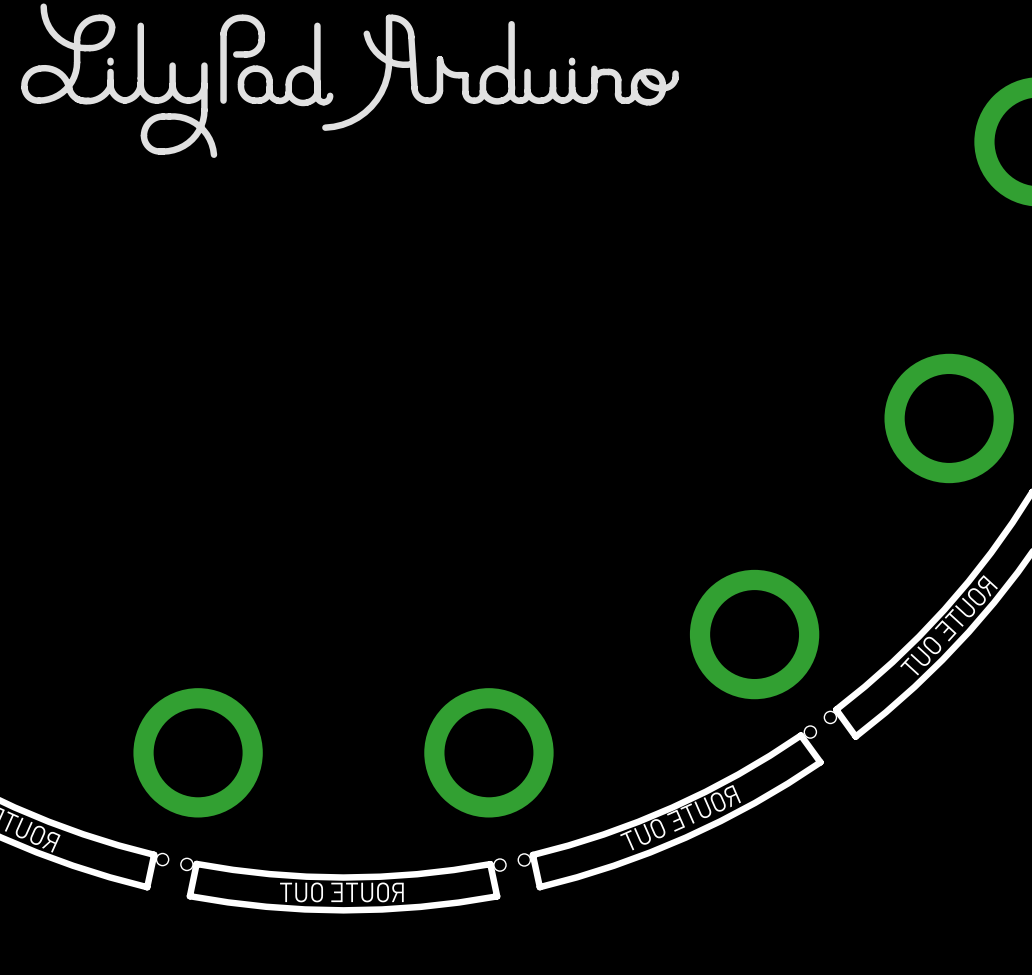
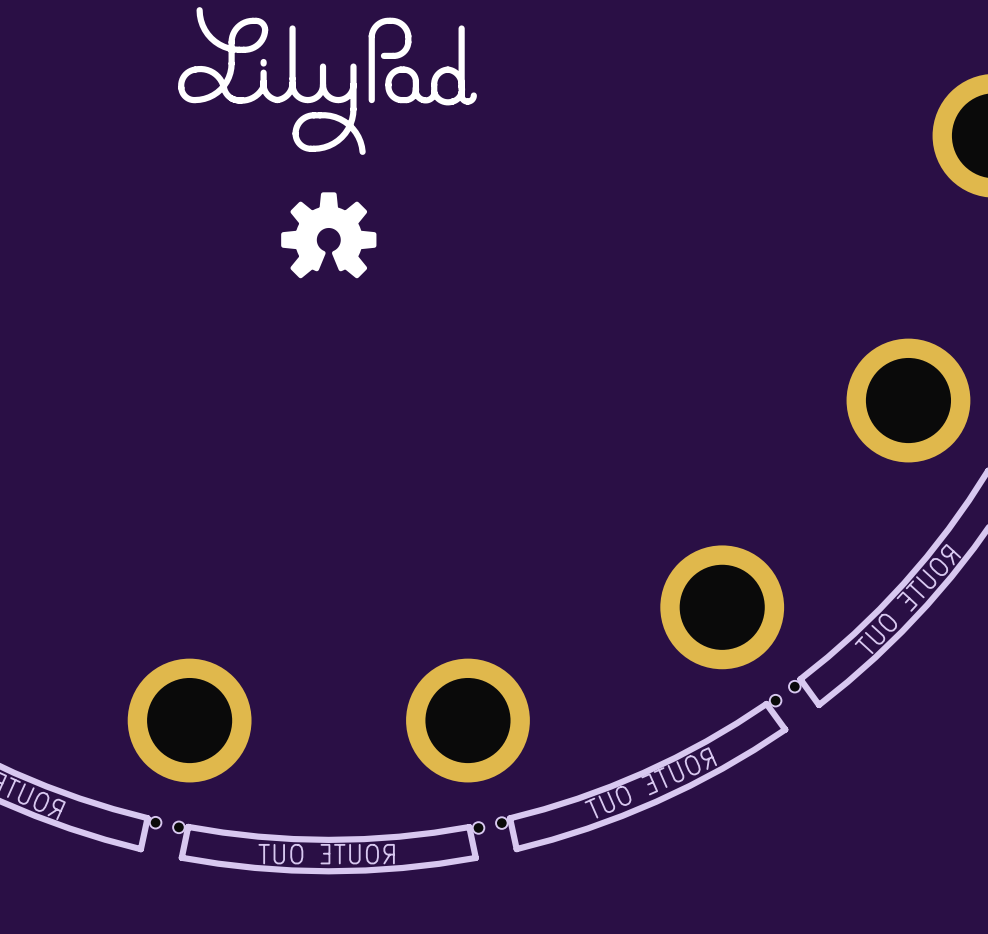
drawing shape: [21, 3, 679, 158] -> [178, 7, 477, 155]
drawing: none -> [281, 192, 377, 279]

